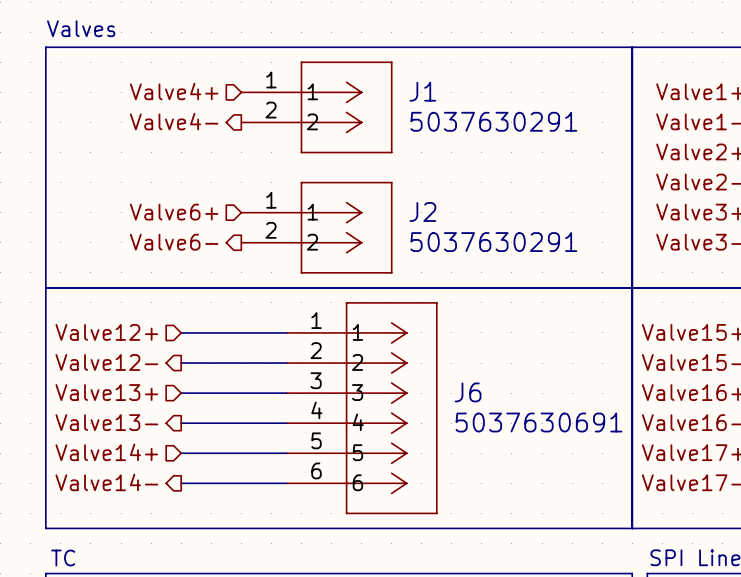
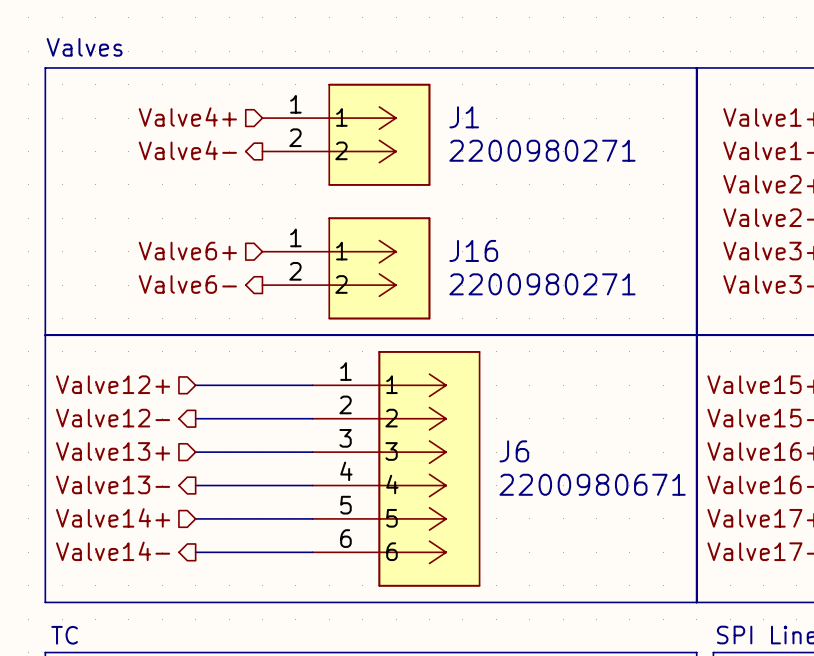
J1 symbol: [241, 61, 393, 154] -> [262, 83, 431, 186]
J1 value: 5037630291 (493, 121) -> 2200980271 (542, 150)
J2: 5037630291 (316, 227) -> none
J16: none -> 2200980271 (346, 268)
J6 symbol: [286, 302, 438, 515] -> [312, 351, 481, 587]
J6 value: 5037630691 (538, 422) -> 2200980671 (592, 484)

